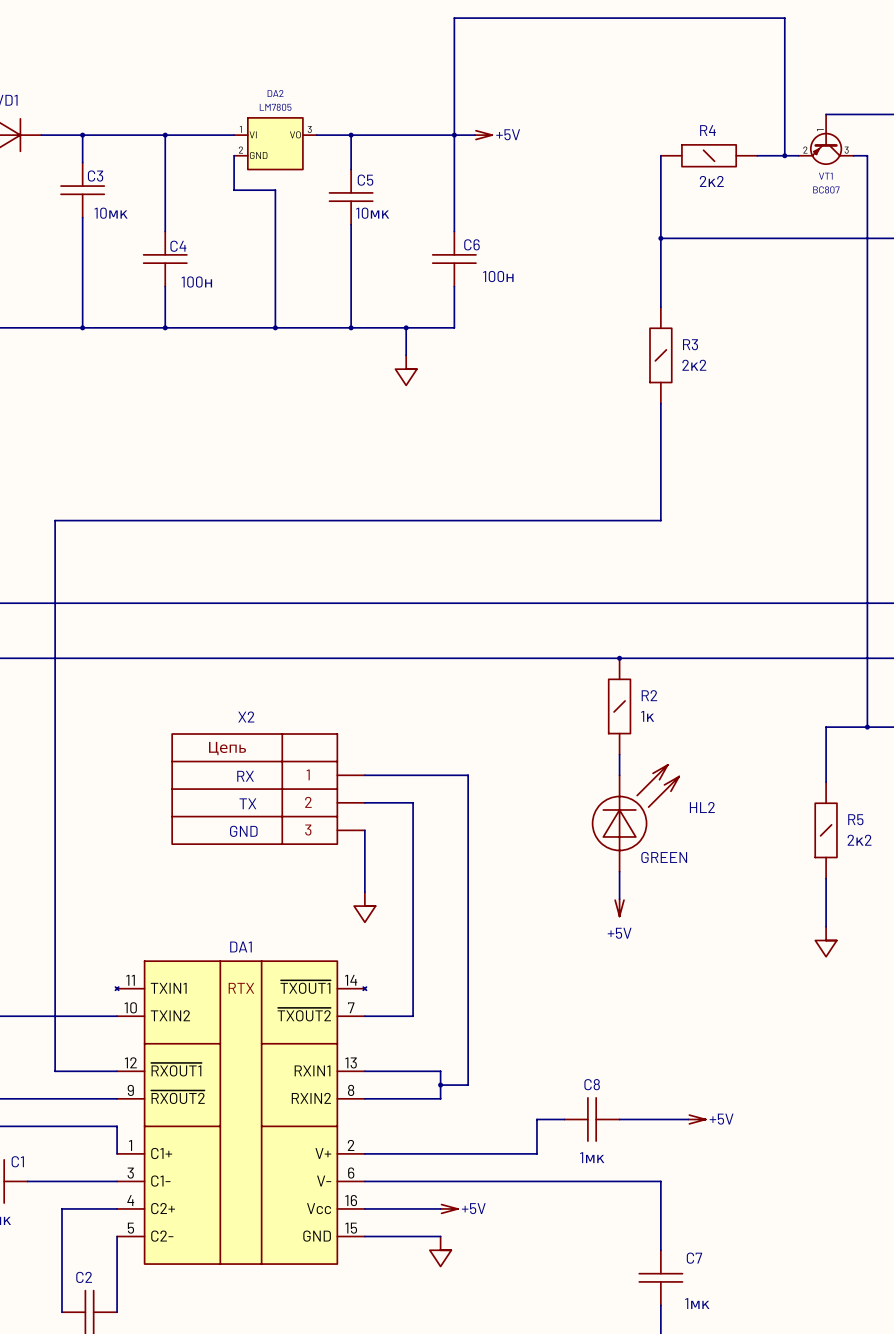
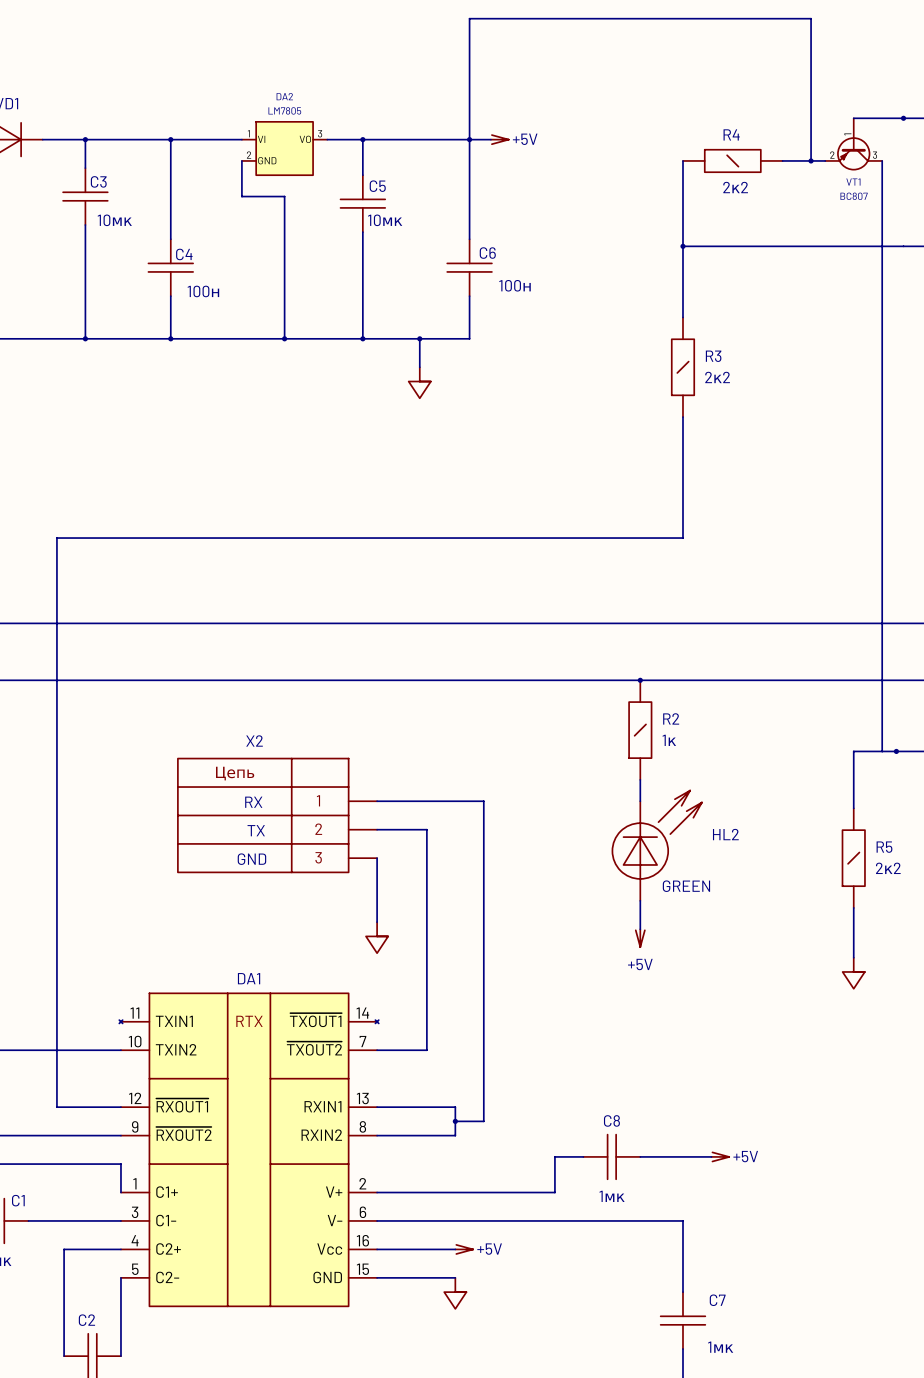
junction: none -> (903, 118)
wire: (853, 155) (867, 155) (867, 727) -> (882, 160) (882, 751)

